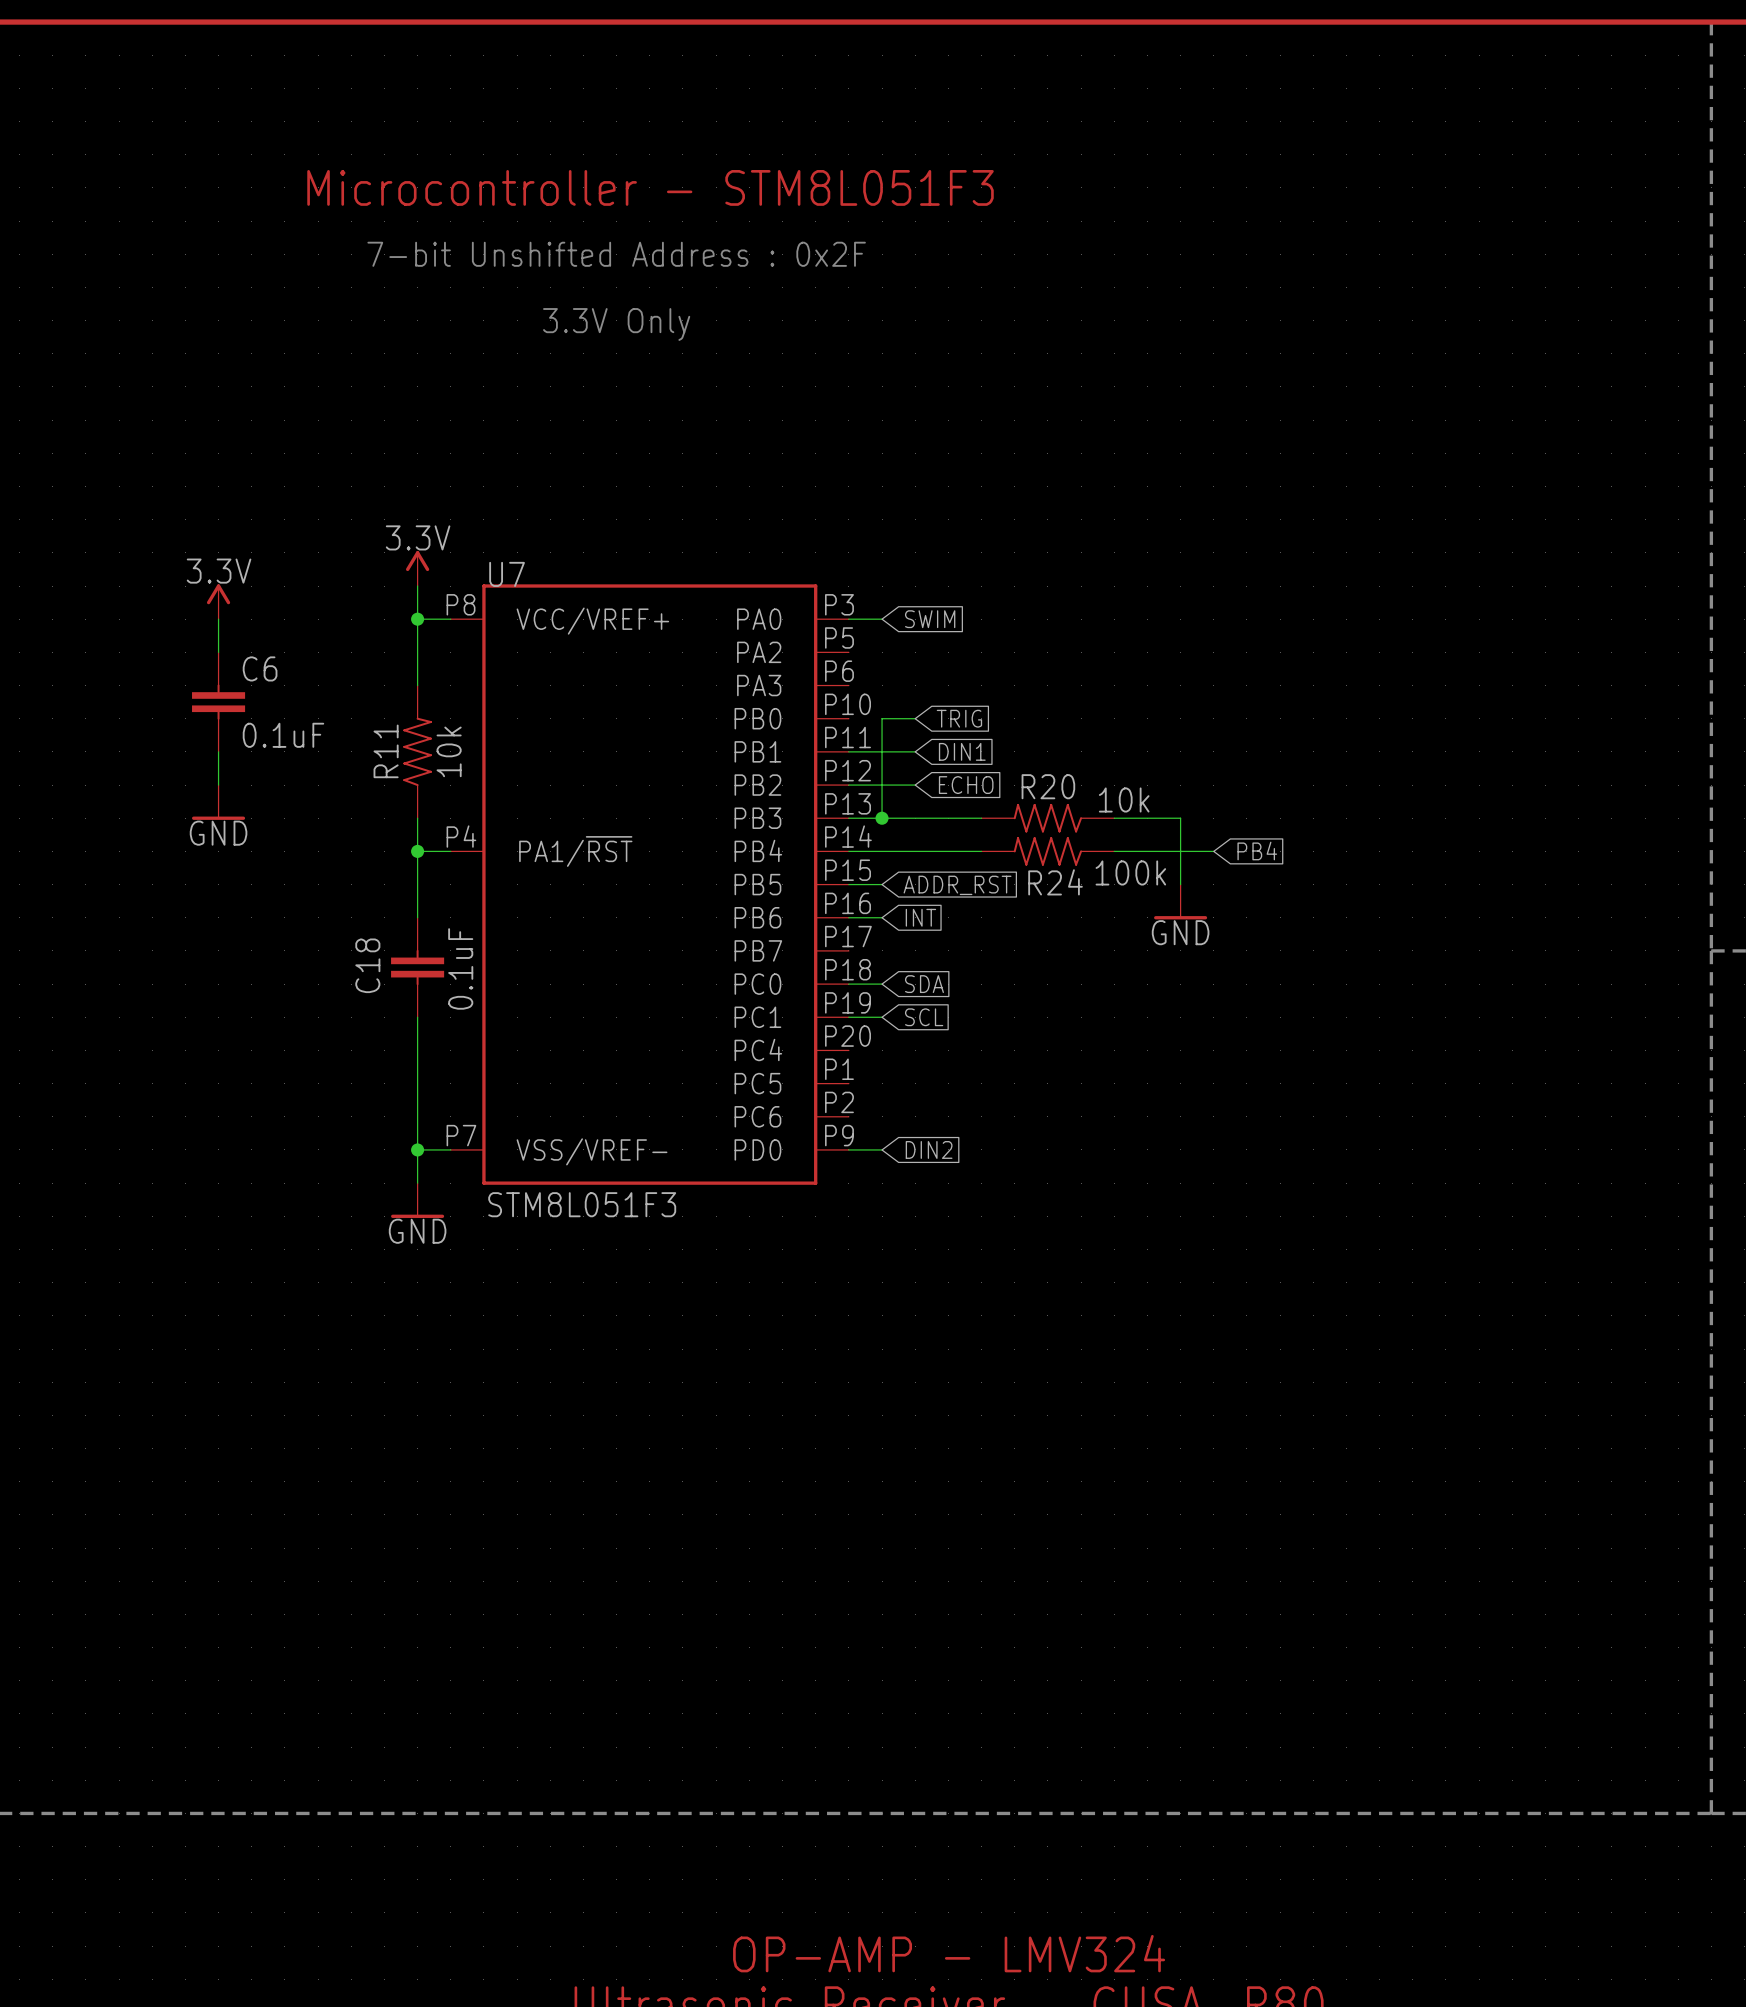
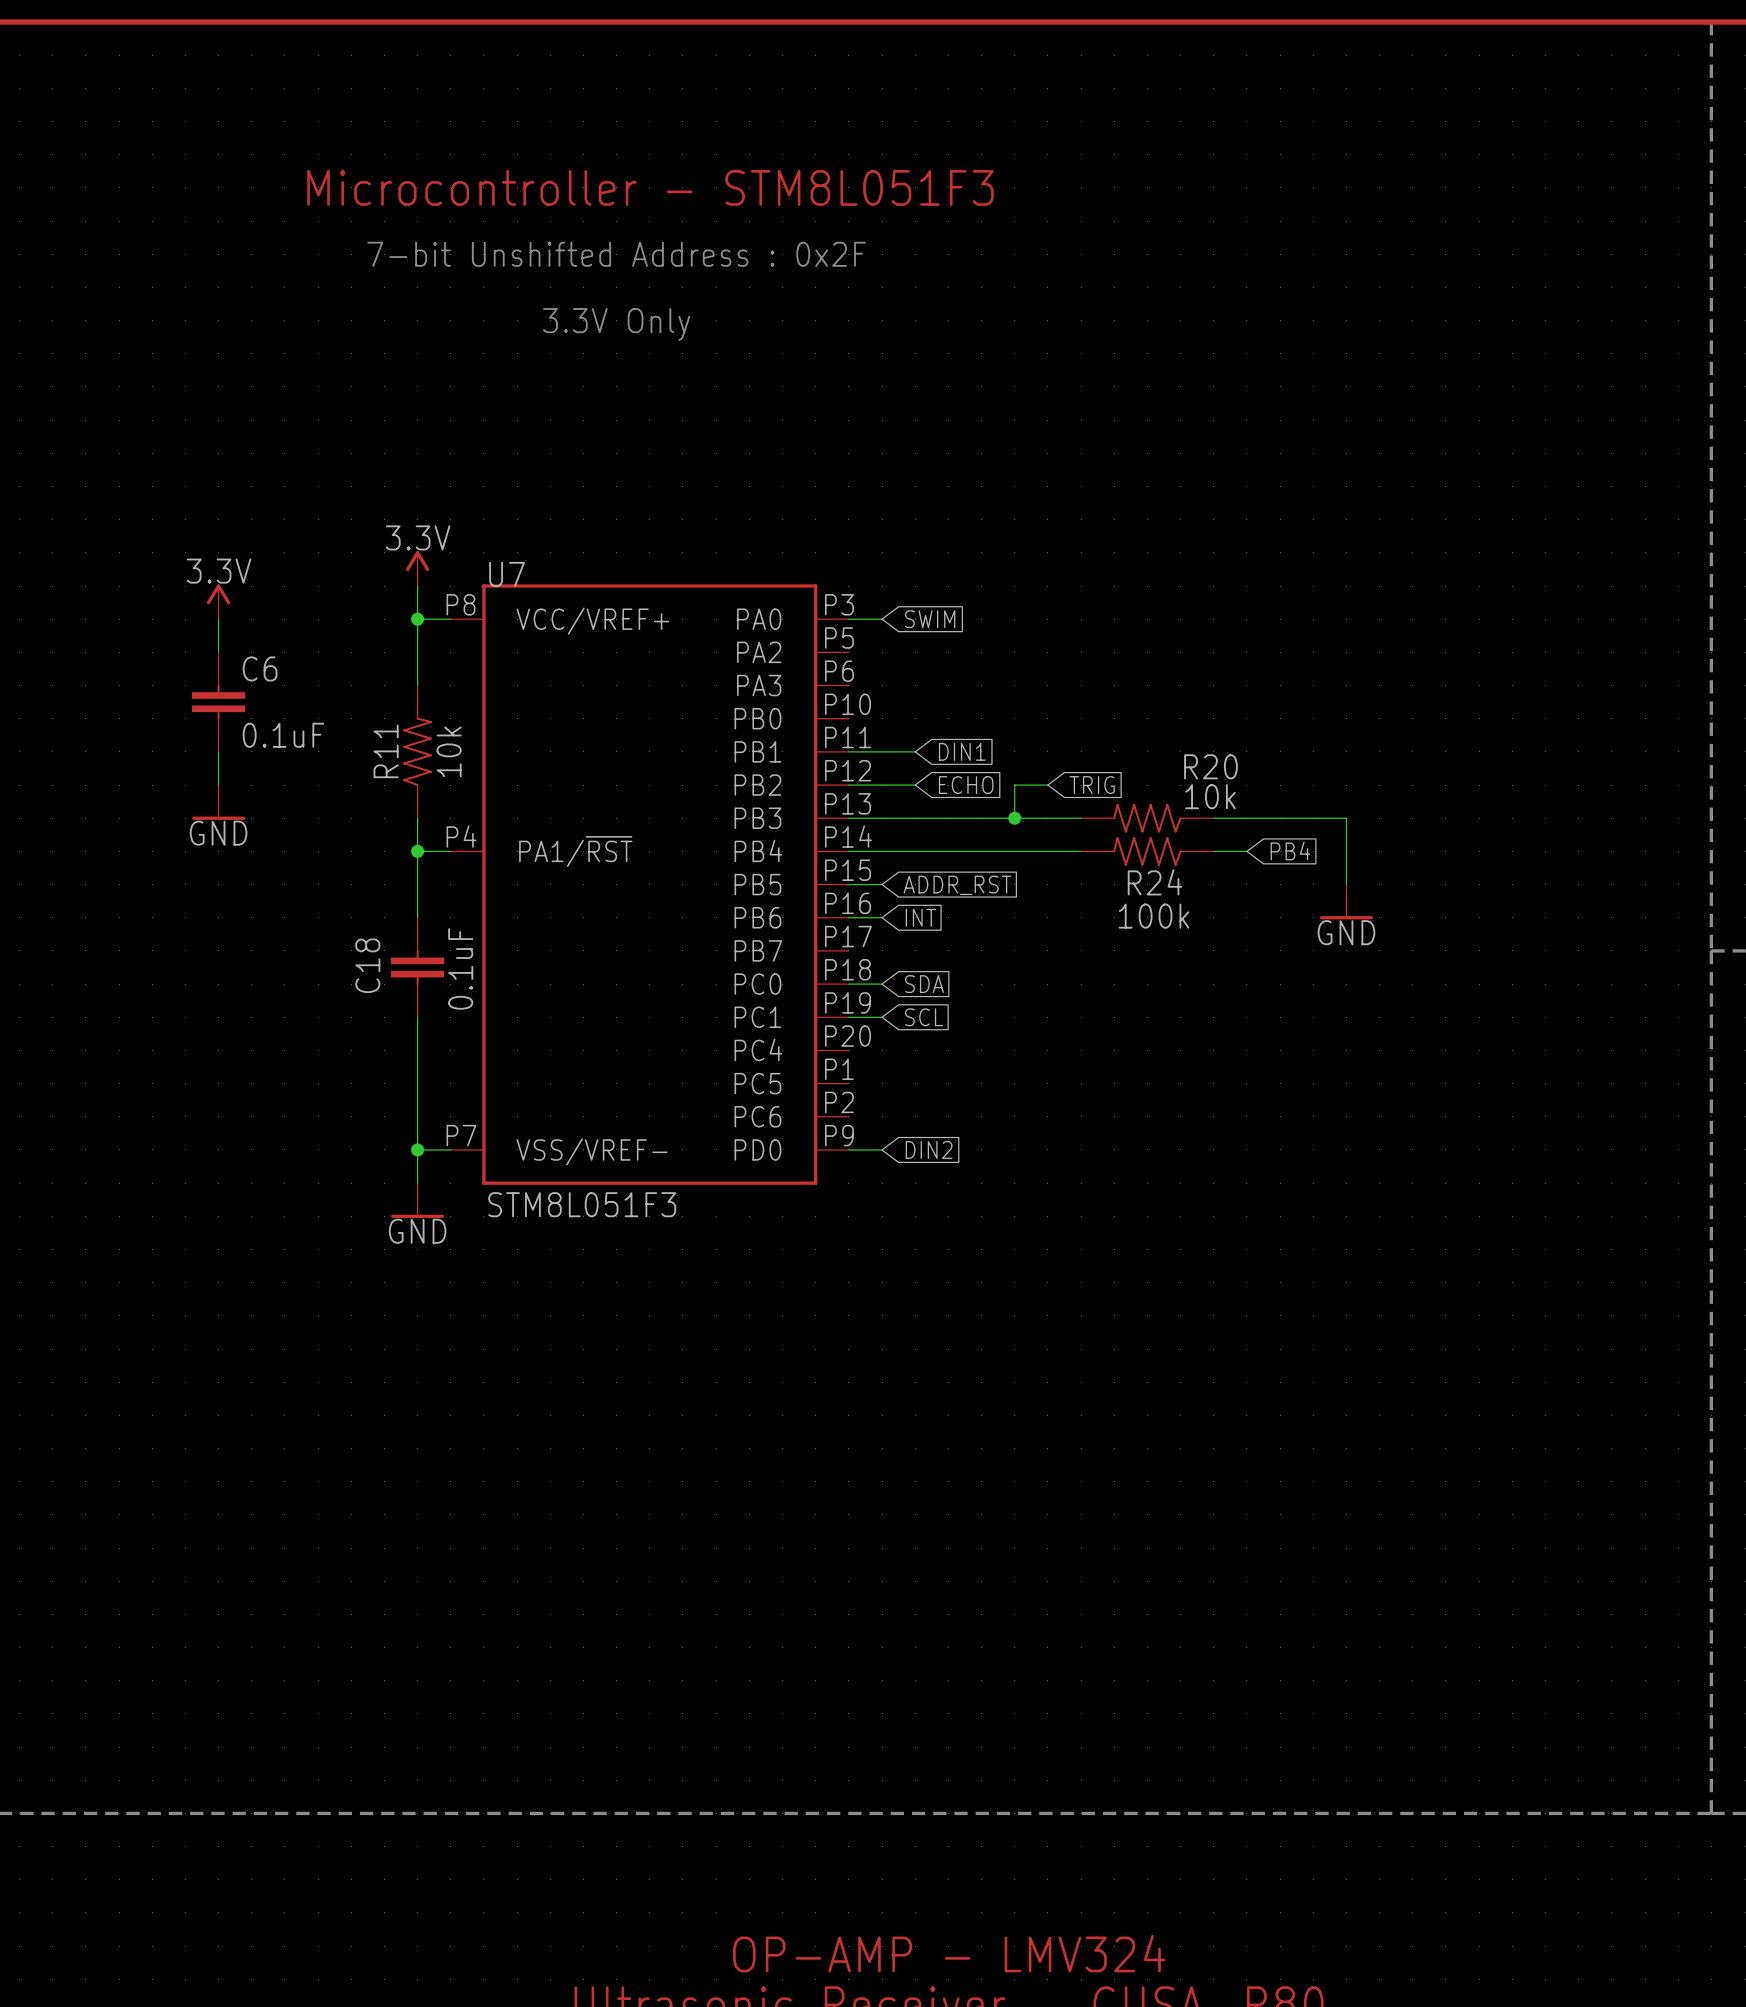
wire: (915, 718) (882, 718) (882, 818) -> none
global label position: TRIG (959, 718) -> TRIG (1092, 785)
wire: none -> (1047, 785) (1014, 785) (1014, 818)
R20 name position: R20 (1048, 786) -> R20 (1210, 766)
R20 value position: 10k (1124, 799) -> 10k (1210, 796)
junction: (882, 818) -> none
wire: none -> (981, 818) (1081, 818)
junction: none -> (1014, 818)
R20 position: (1047, 818) -> (1147, 818)
wire: (1114, 818) (1180, 818) (1180, 884) -> none
wire: none -> (1213, 818) (1346, 818) (1346, 884)
wire: none -> (981, 851) (1081, 851)
R24 position: (1047, 851) -> (1147, 851)
wire: (1114, 851) (1213, 851) -> (1246, 851) (1213, 851)
global label position: PB4 (1257, 851) -> PB4 (1290, 851)
R24 value position: 100k (1130, 872) -> 100k (1154, 916)
power symbol position: GND (1180, 901) -> GND (1346, 901)

